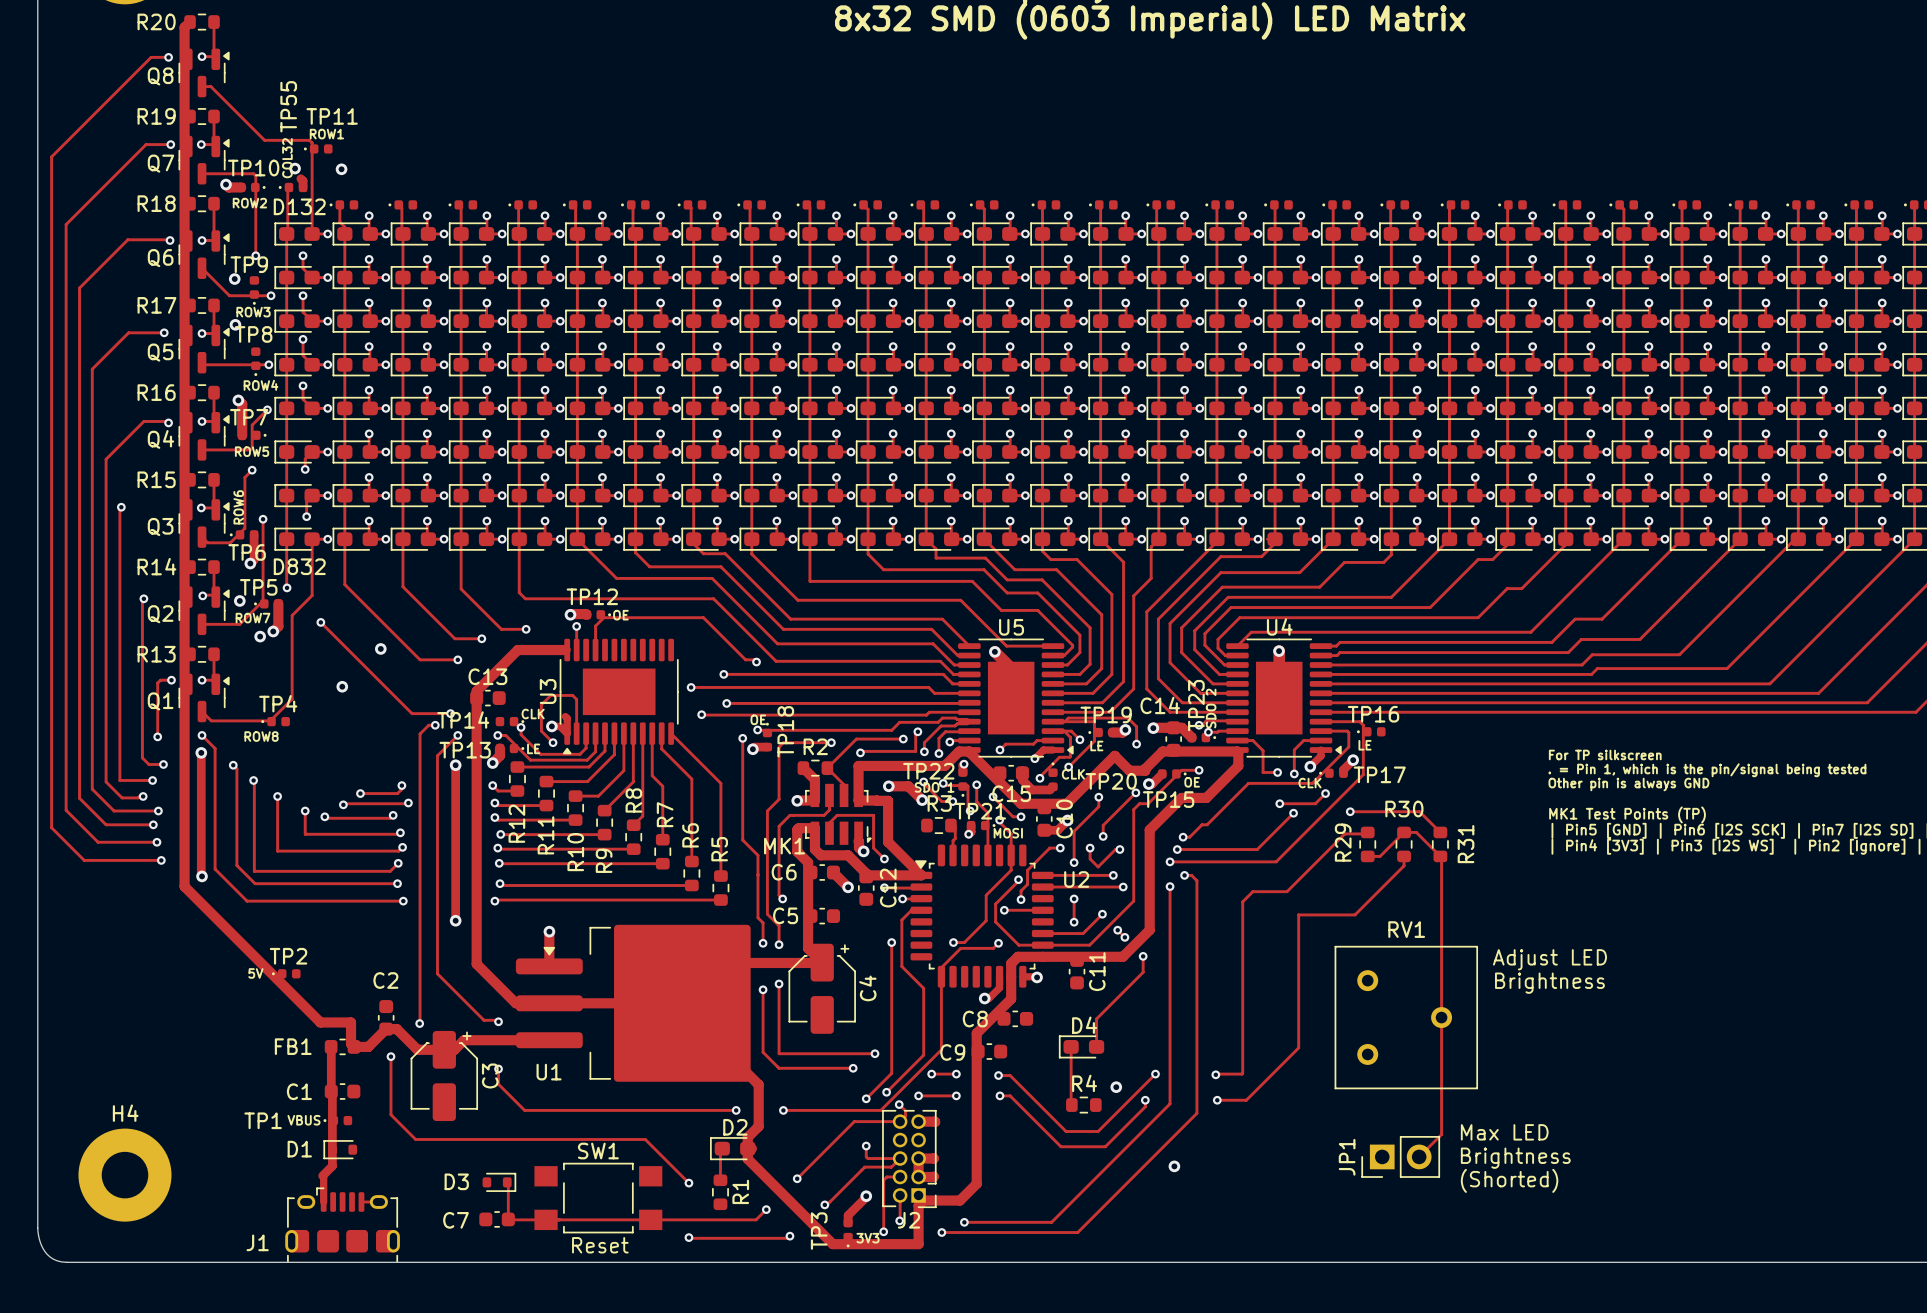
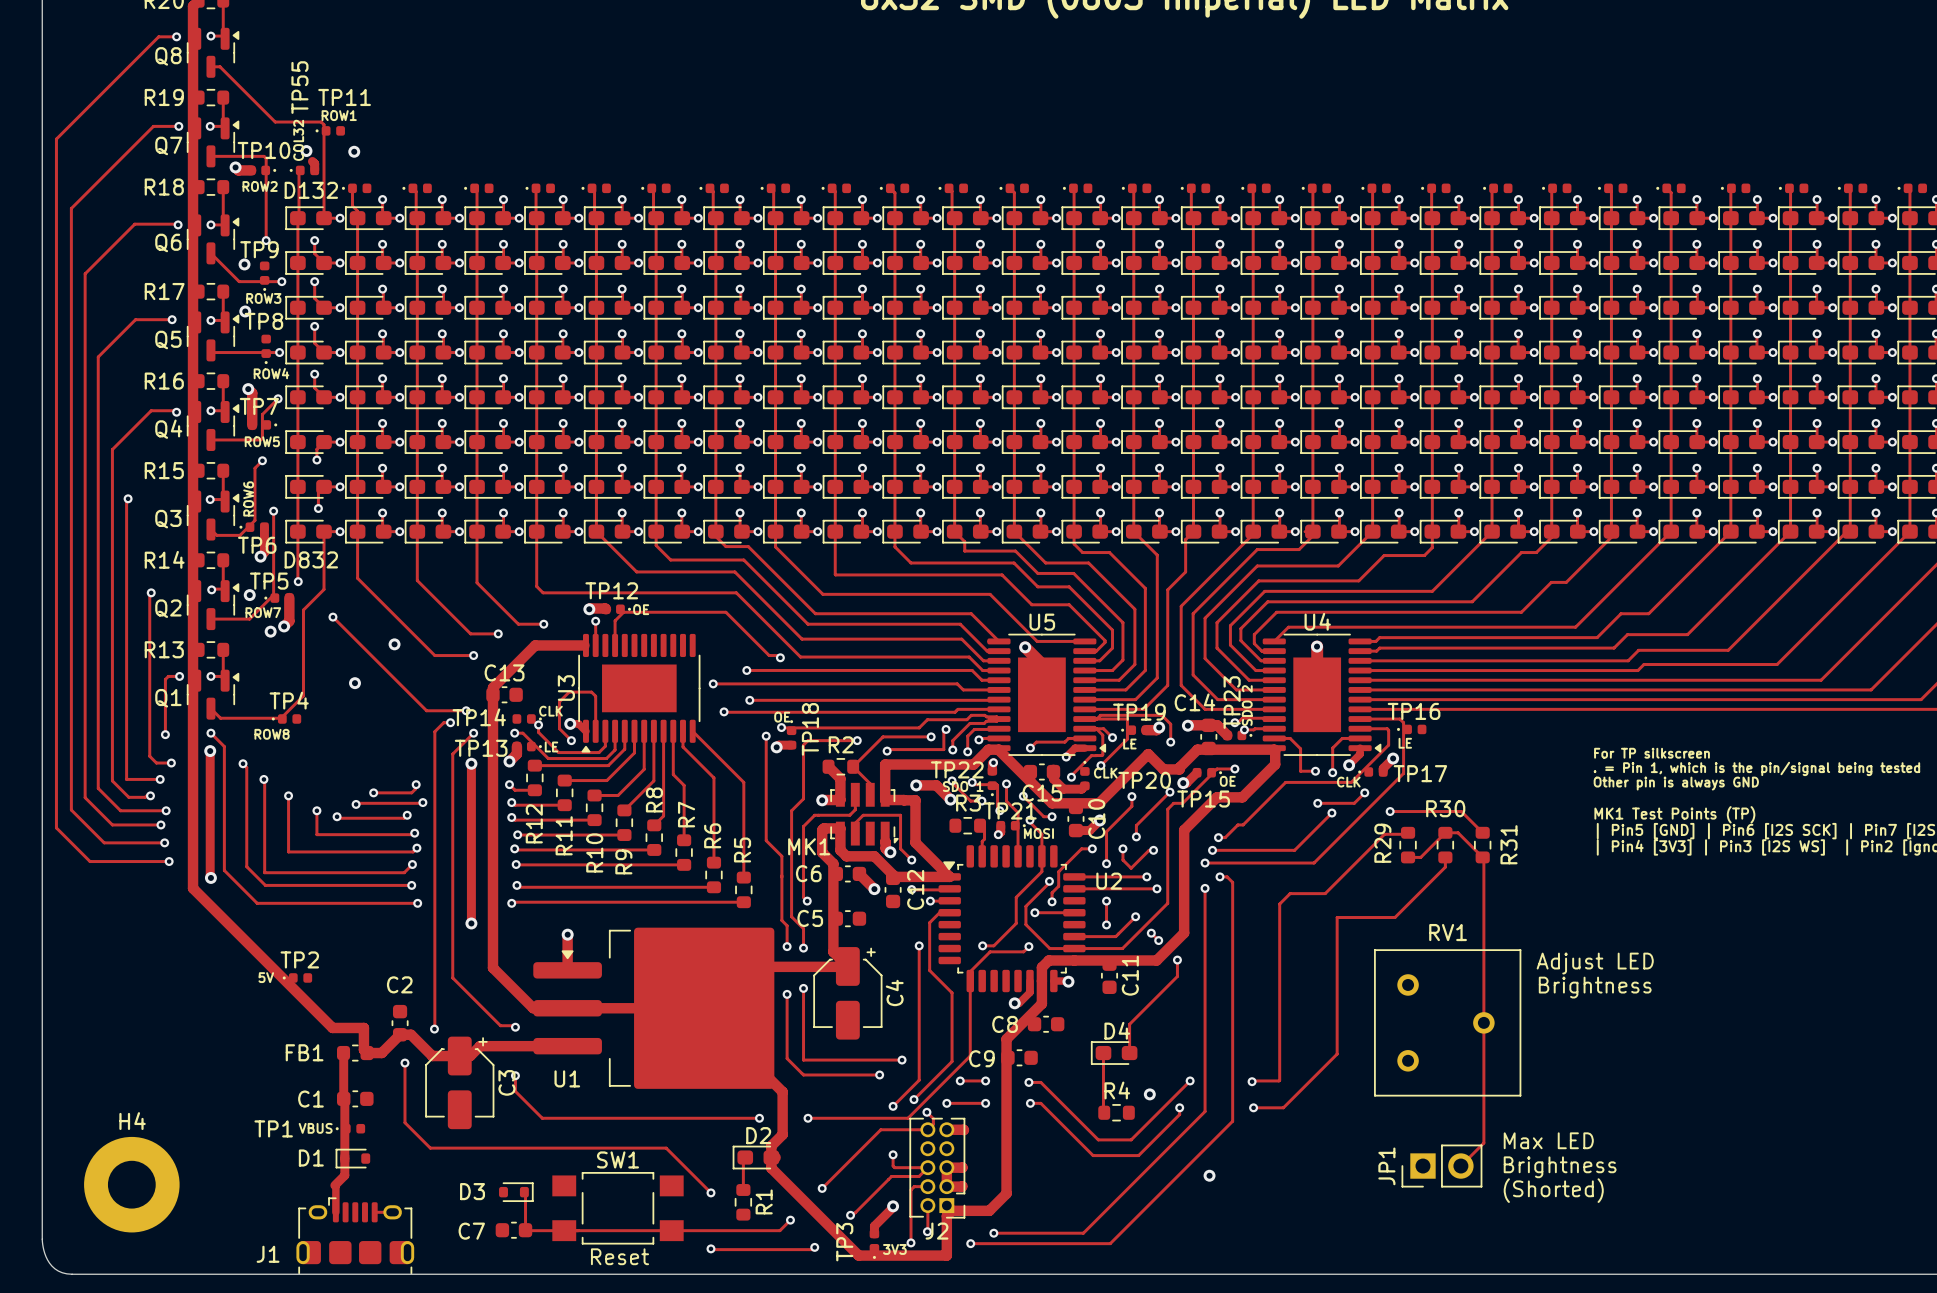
track: (565, 716) (567, 718) (567, 733) -> none

